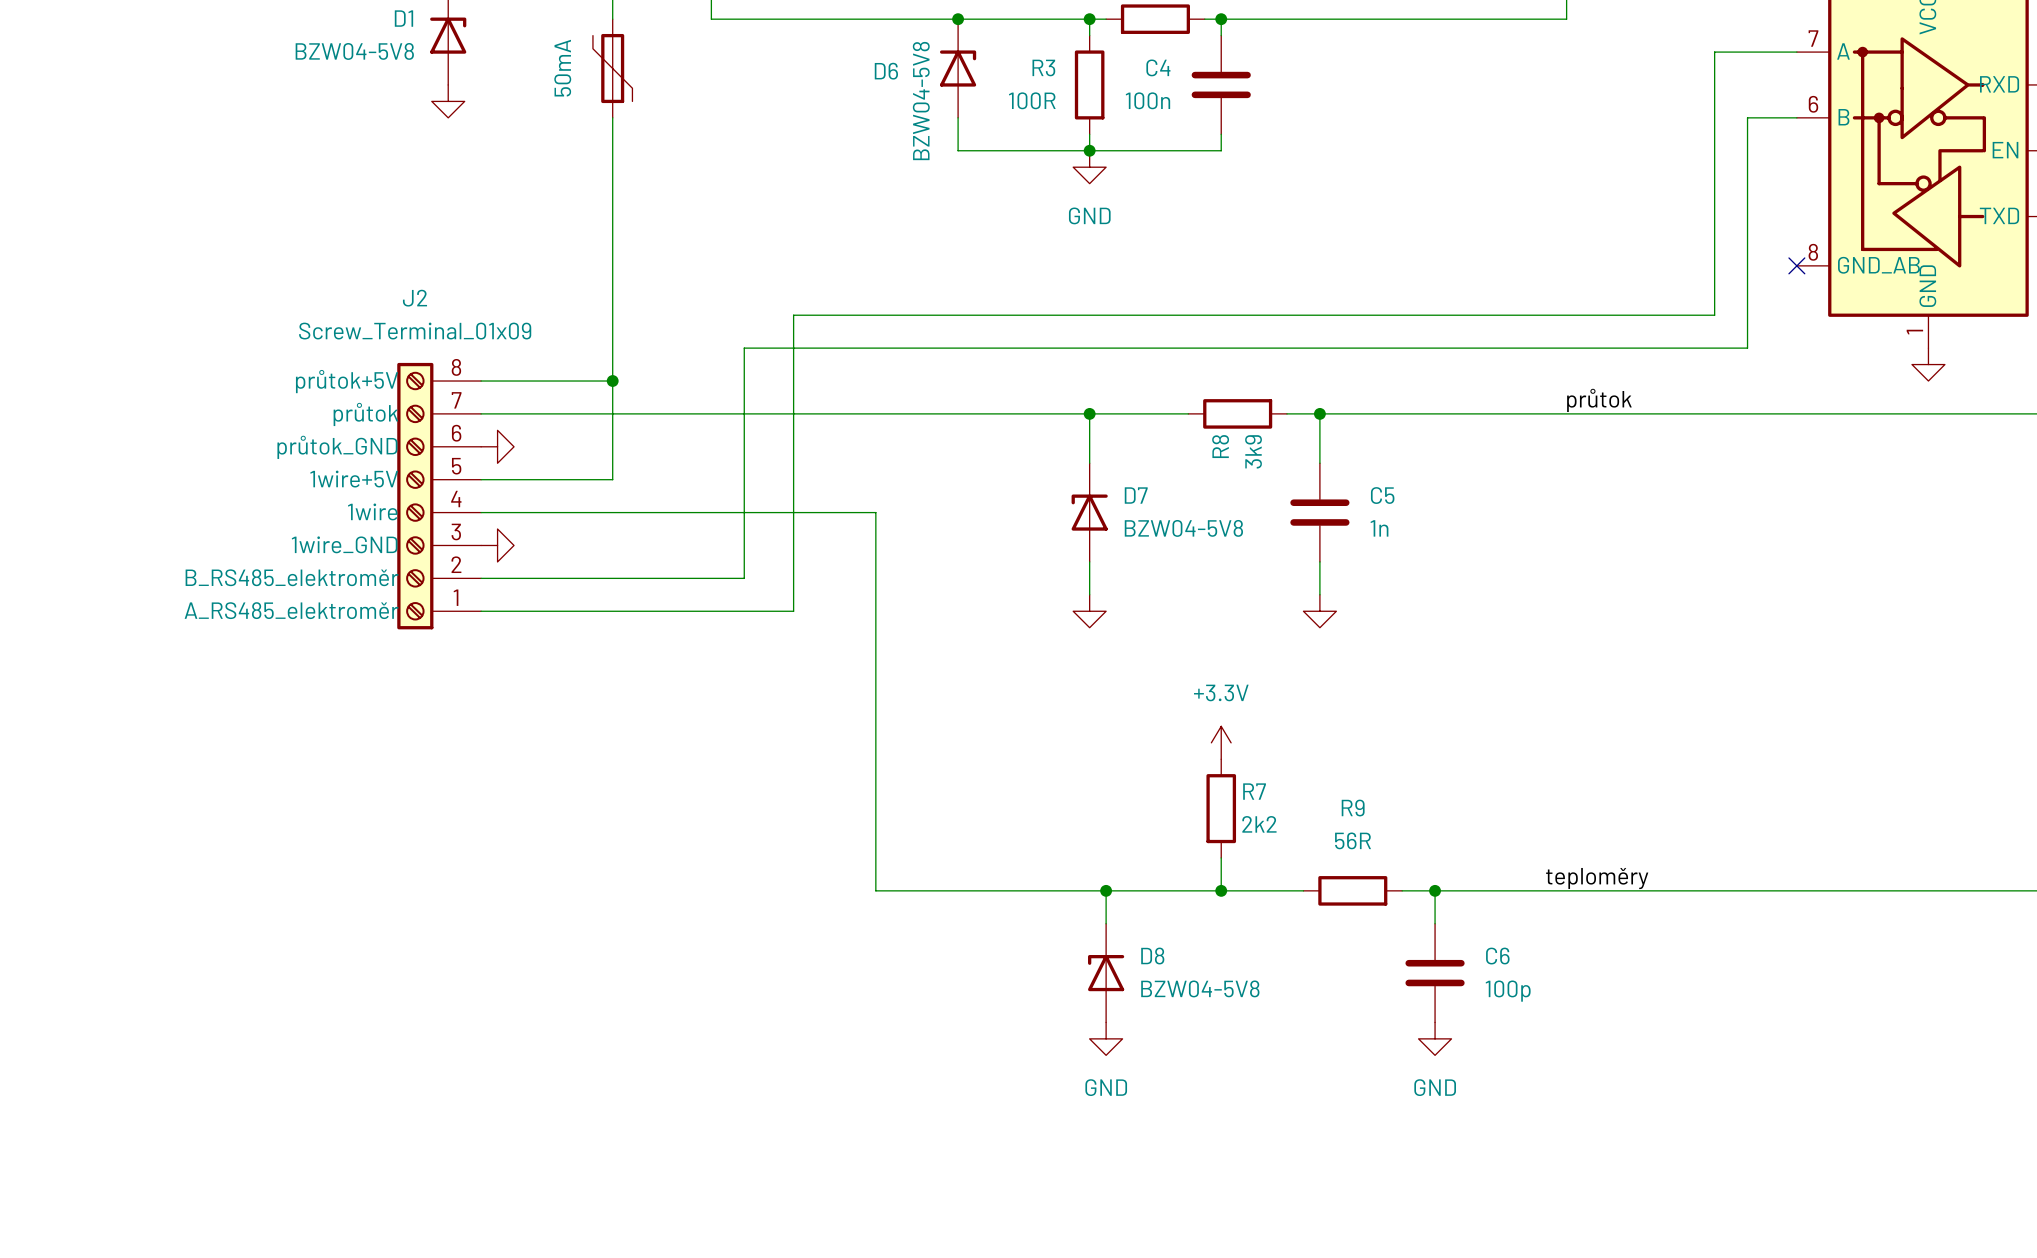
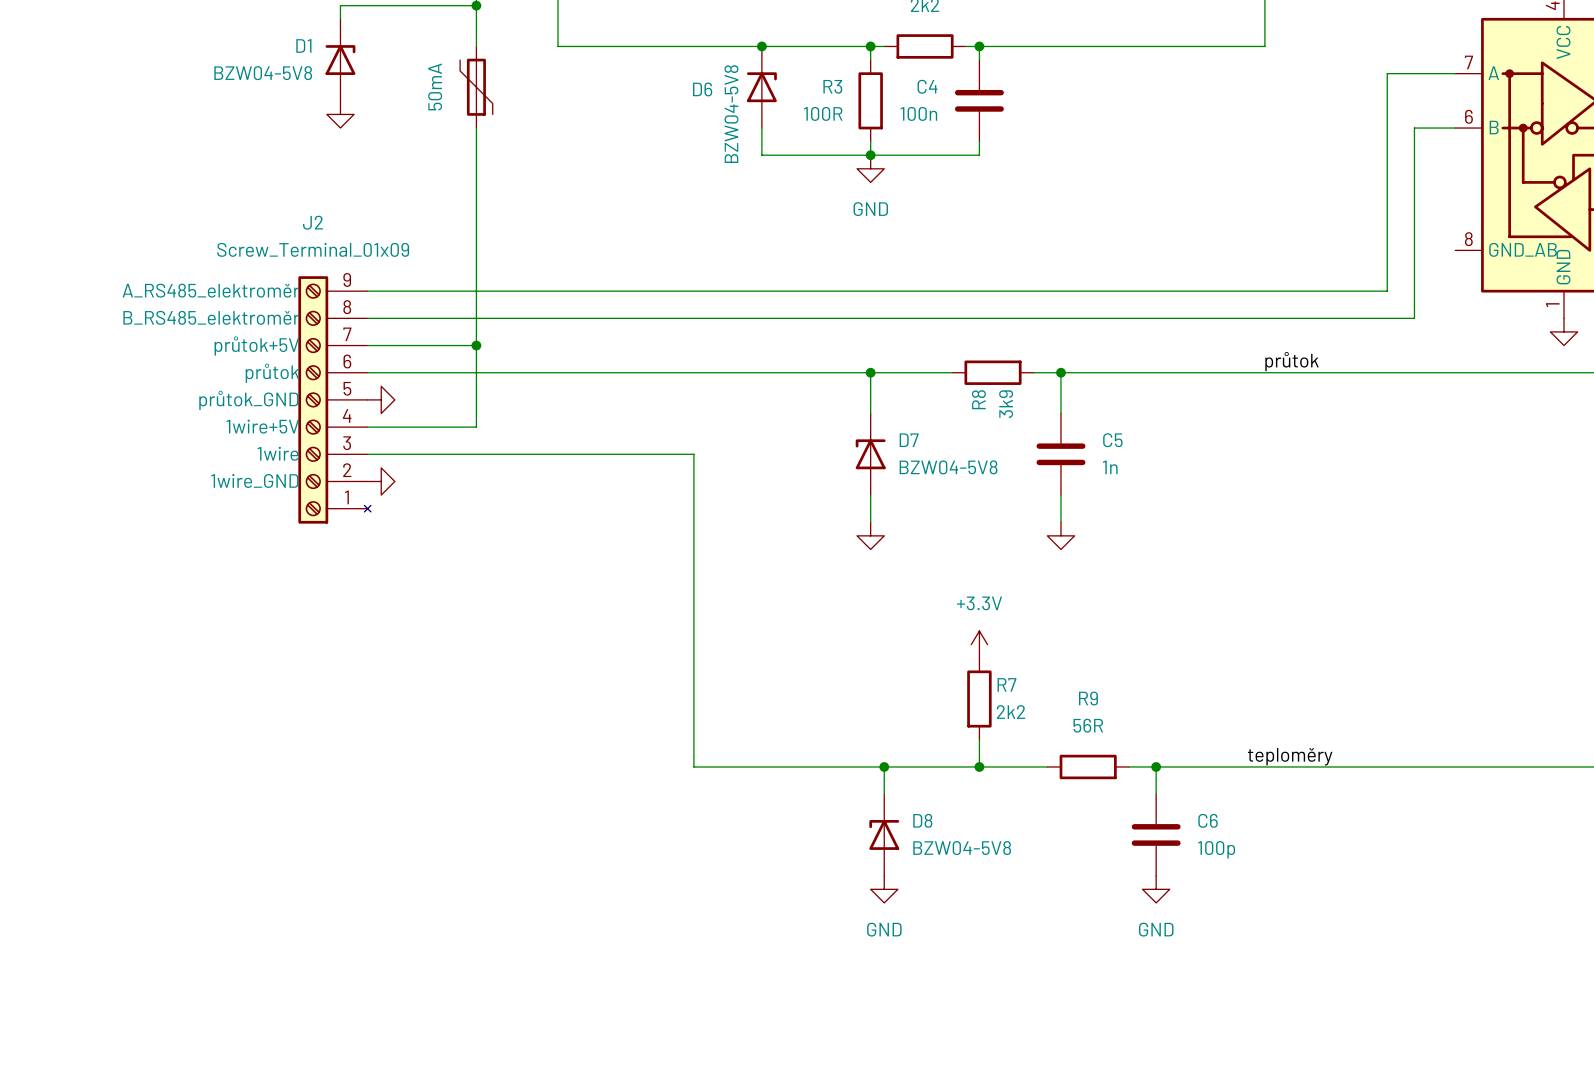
no-connect mark: (1796, 265) -> none
wire: (793, 315) (793, 611) (481, 611) -> (625, 291) (367, 291)
wire: (744, 348) (744, 578) (481, 578) -> (585, 318) (367, 318)
J2 symbol: [397, 362, 482, 630] -> [298, 276, 371, 524]

